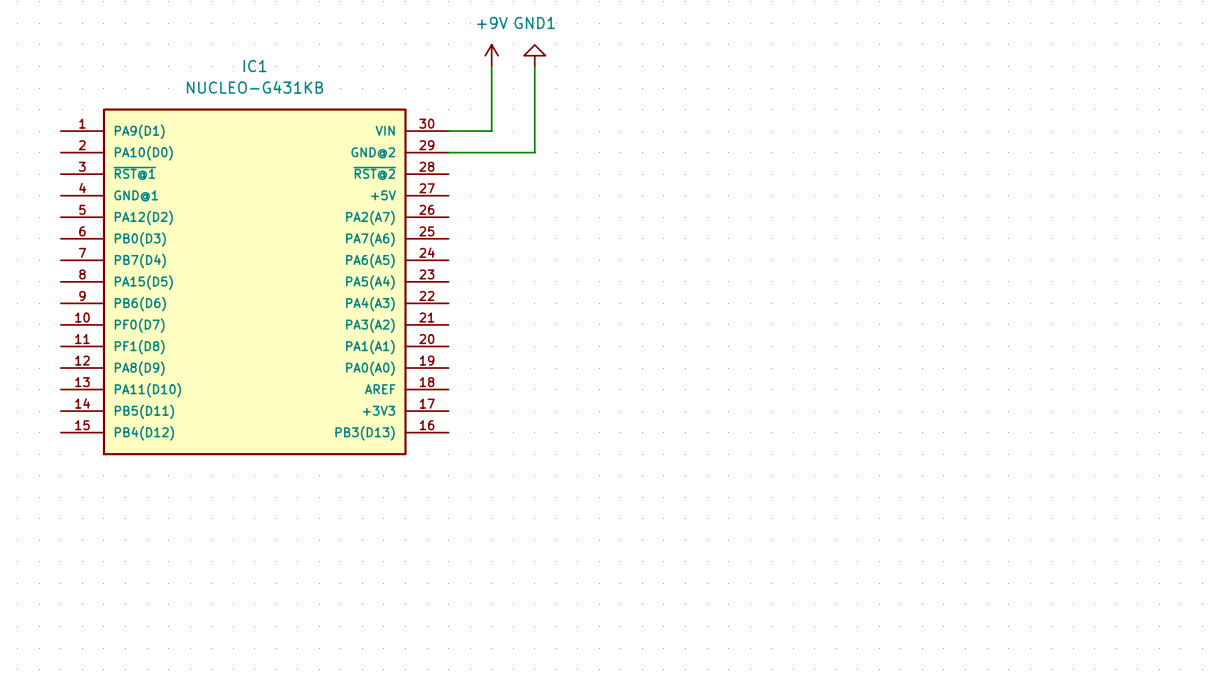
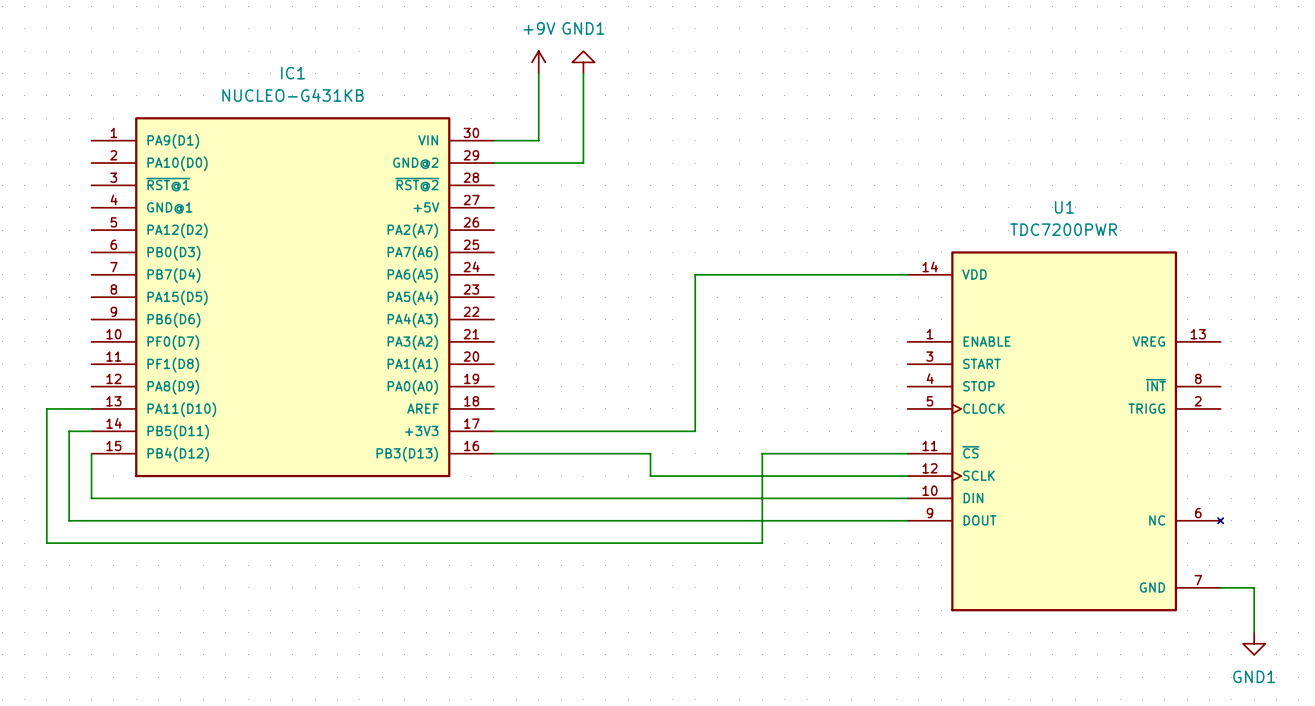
wire: none -> (907, 274) (695, 274) (695, 431) (493, 431)
wire: none -> (91, 408) (46, 408) (46, 543) (762, 543) (762, 453) (907, 453)
wire: none -> (91, 431) (69, 431) (69, 520) (907, 520)
U1: none -> TDC7200PWR (1065, 431)
wire: none -> (91, 453) (91, 498) (907, 498)
wire: none -> (493, 453) (650, 453) (650, 476) (907, 476)
wire: none -> (1220, 587) (1254, 587) (1254, 632)
power symbol: none -> GND1 (1254, 643)

